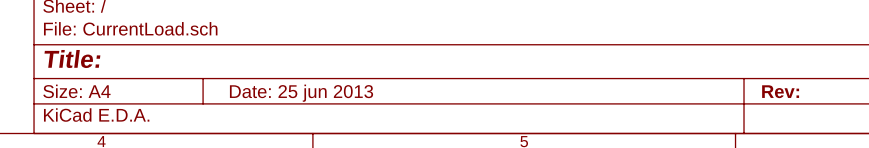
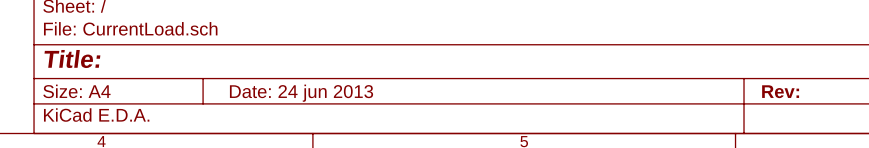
title block: Date: 25 jun 2013 (301, 93) -> Date: 24 jun 2013 (301, 93)

